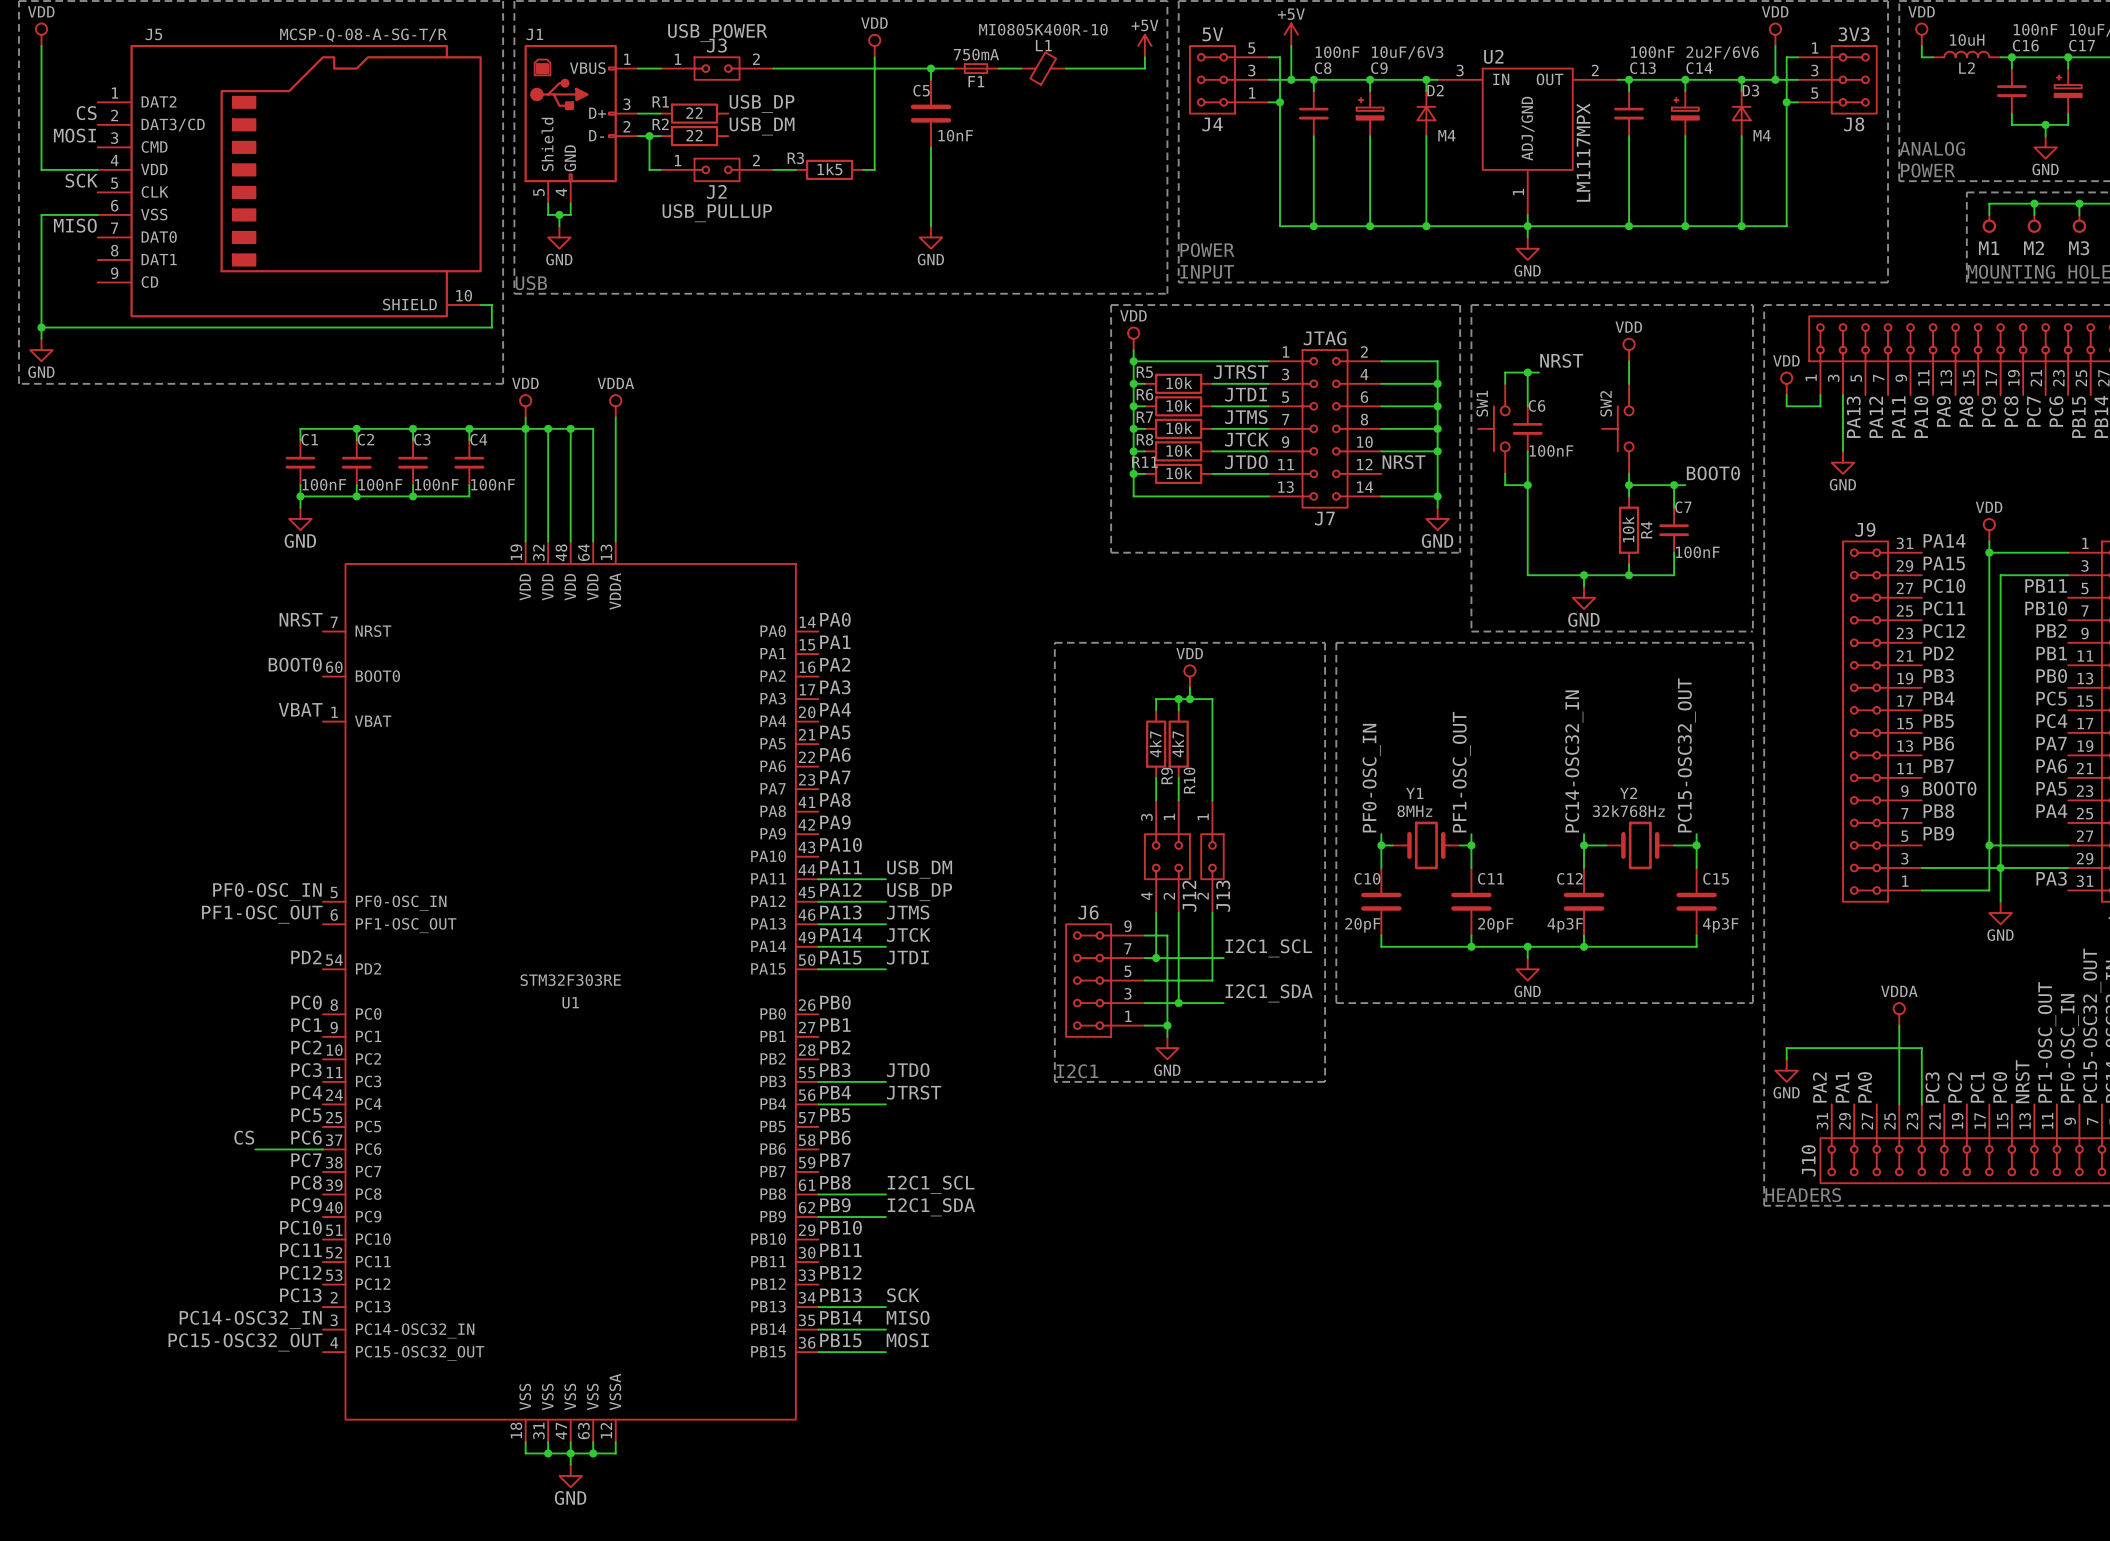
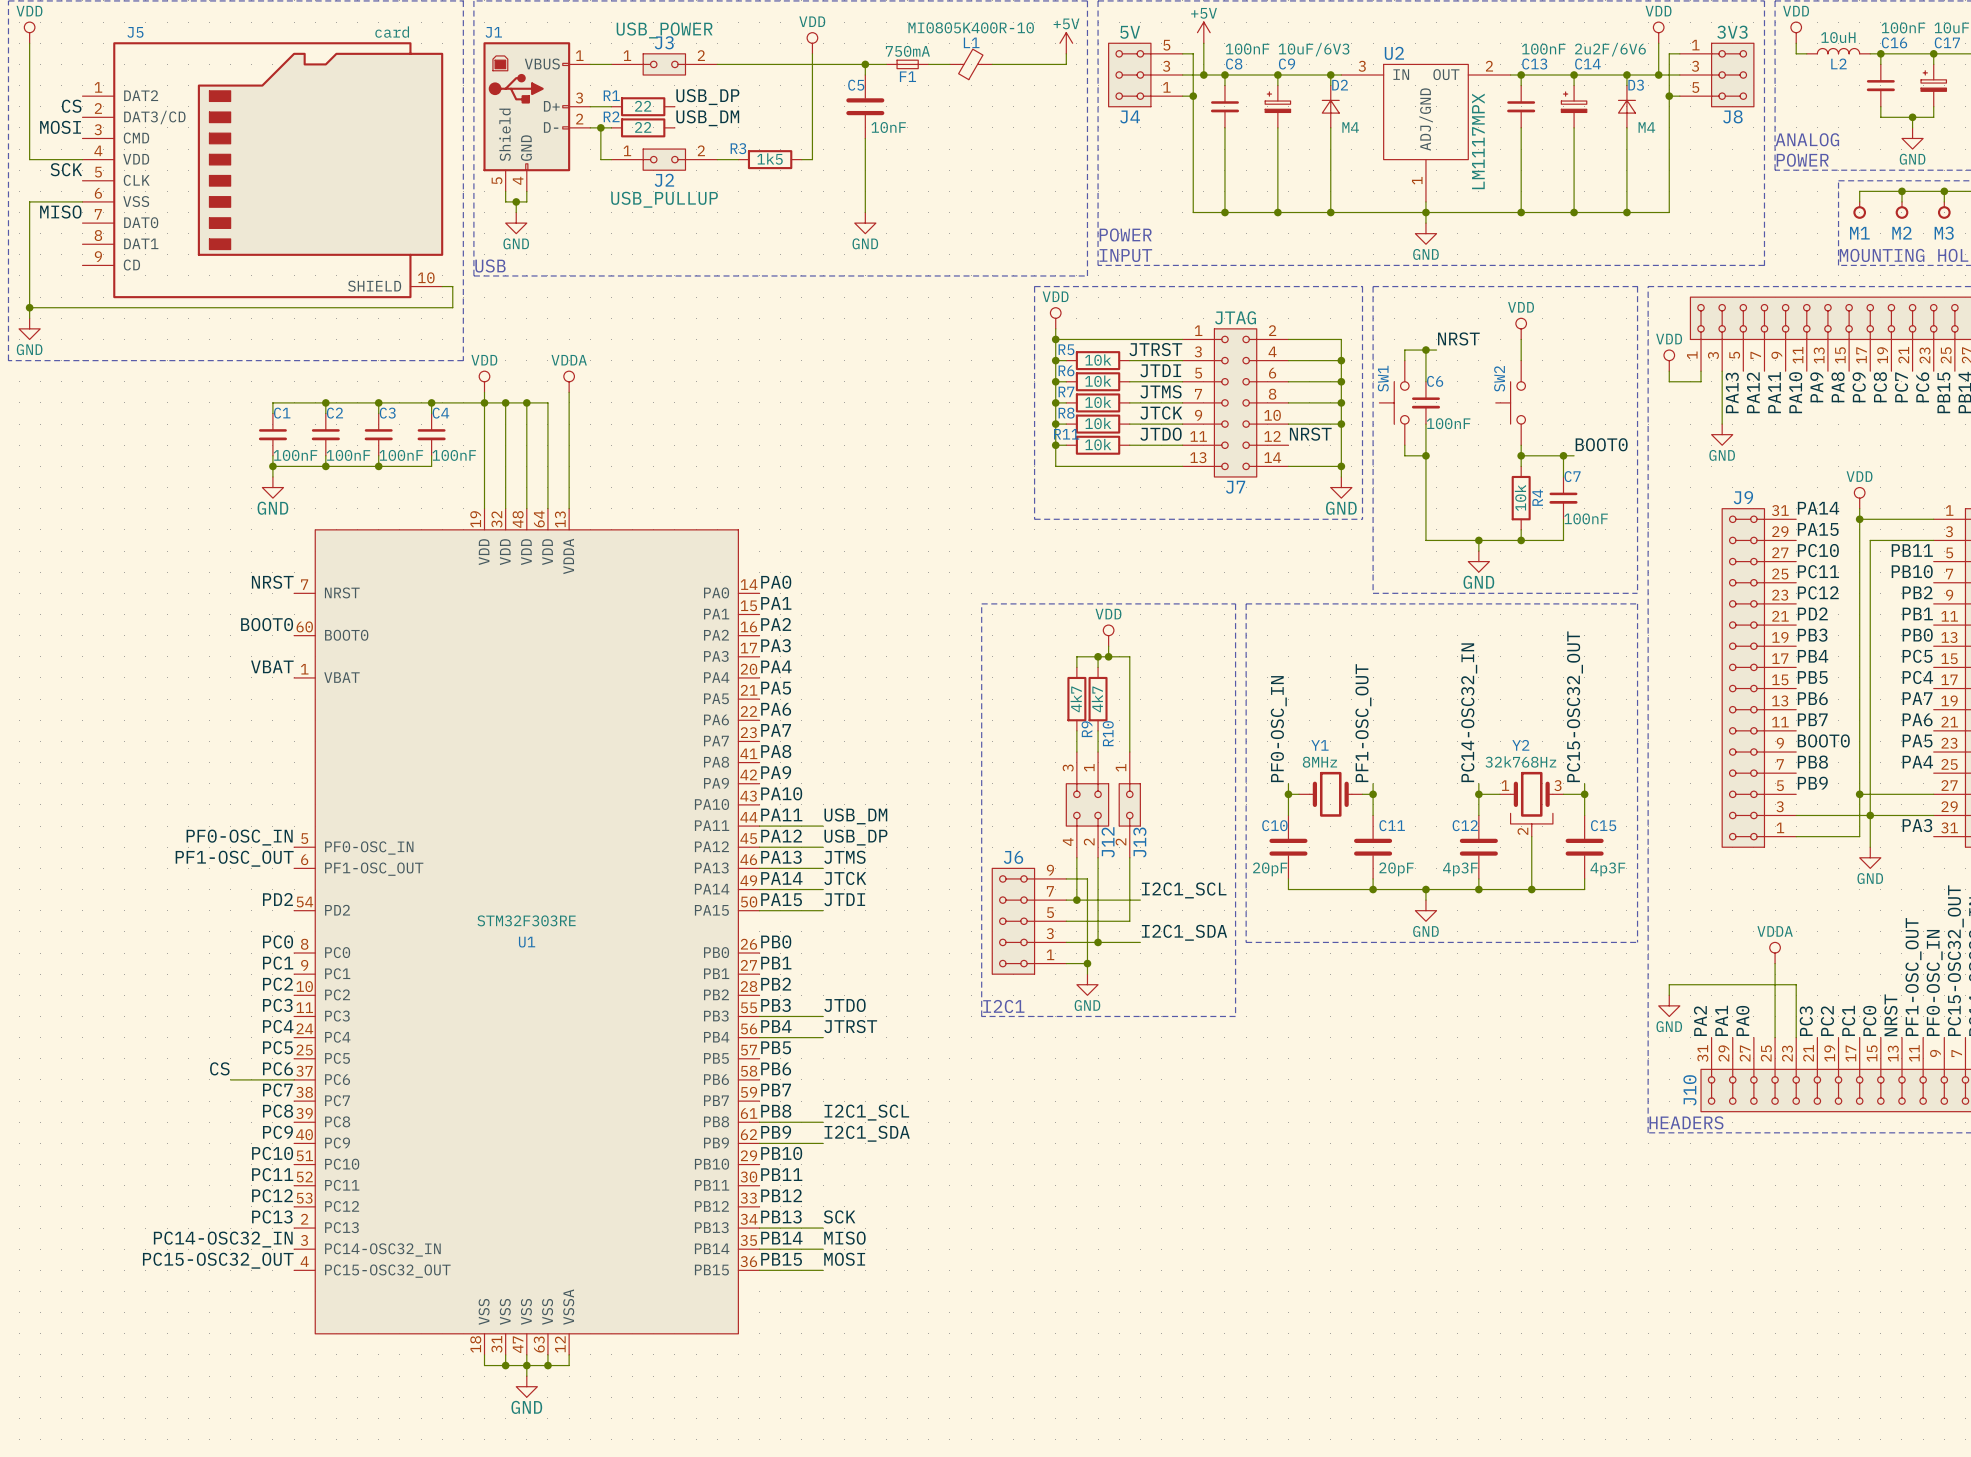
J5 value: MCSP-Q-08-A-SG-T/R (363, 35) -> card (392, 32)
Y2 symbol: [1606, 821, 1675, 870] -> [1500, 771, 1564, 837]
wire: none -> (1531, 836) (1531, 889)
junction: none -> (1531, 889)

